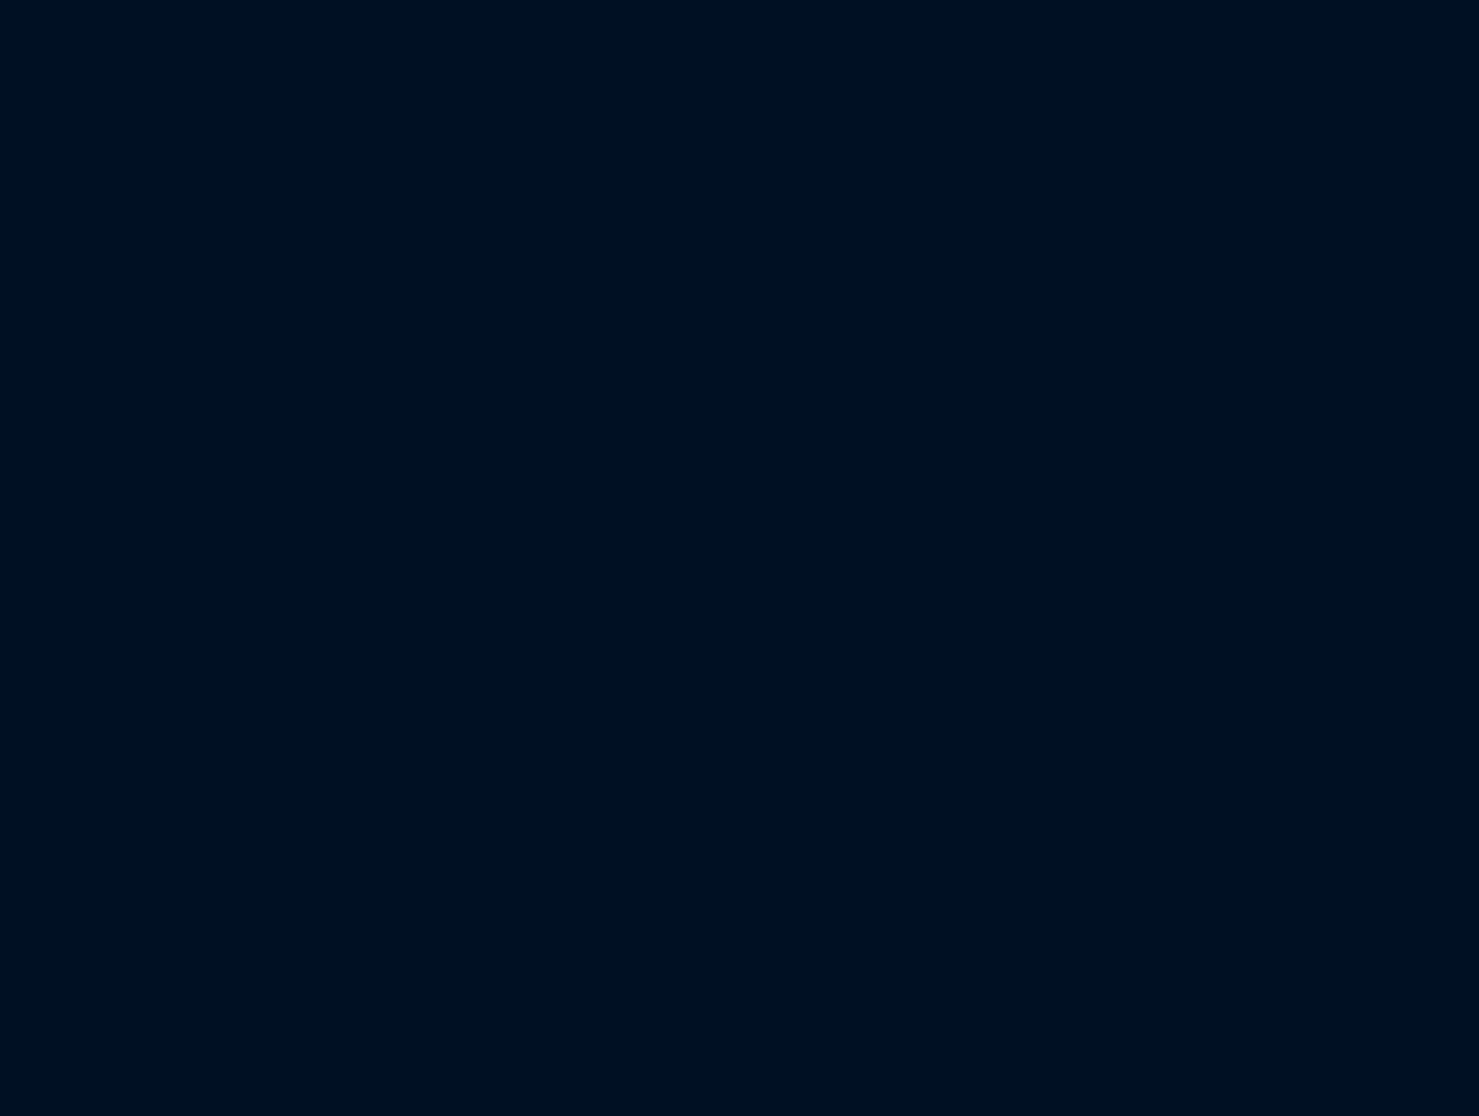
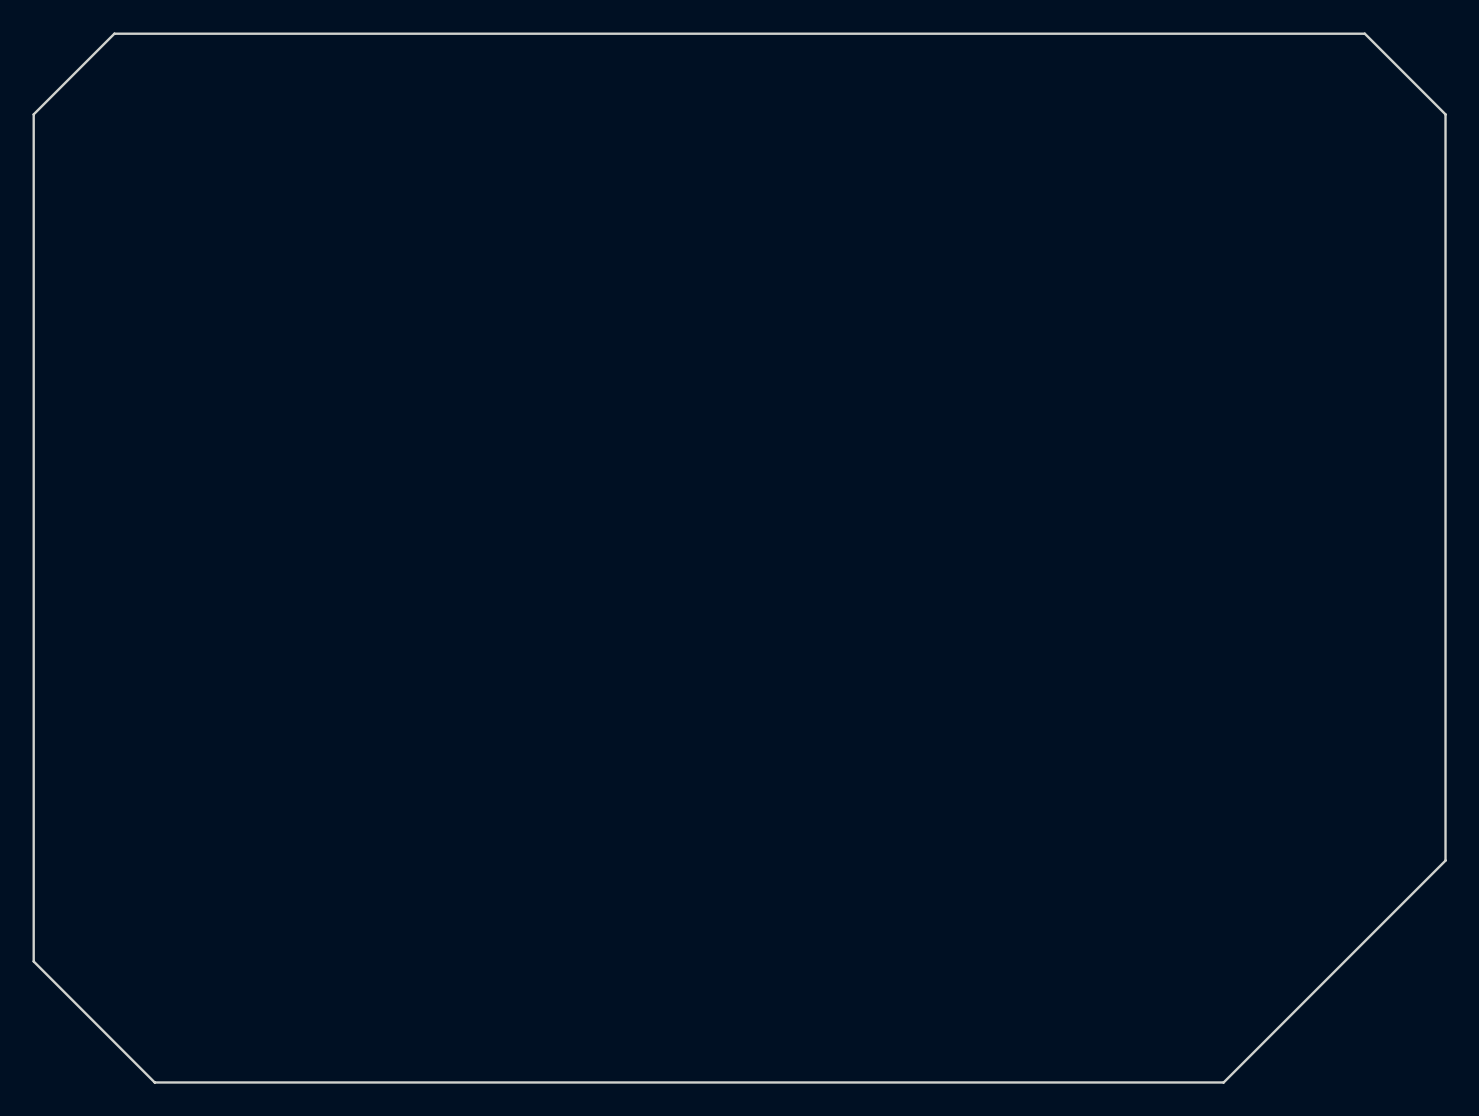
board edge: none -> (1364, 33) (1445, 114) (1445, 860) (1223, 1082) (154, 1082) (33, 961) (33, 114) (114, 33) (1364, 33)

